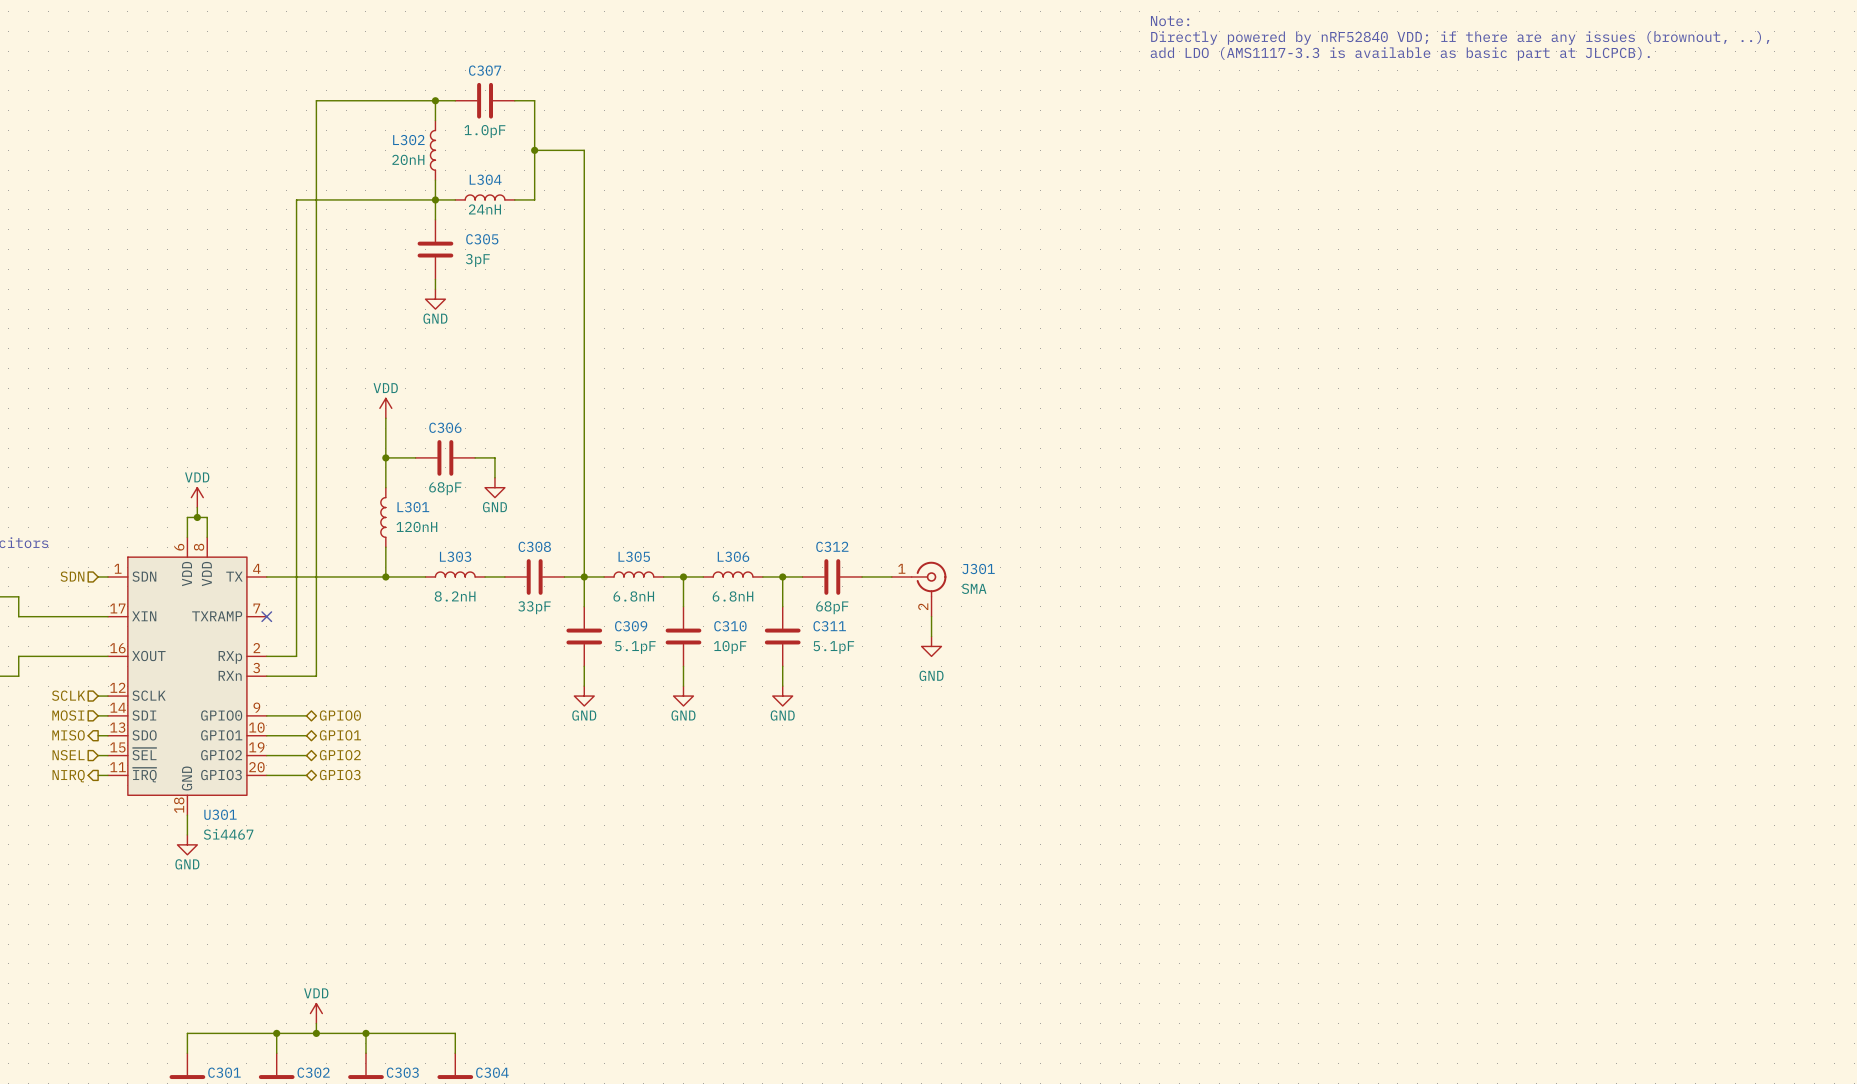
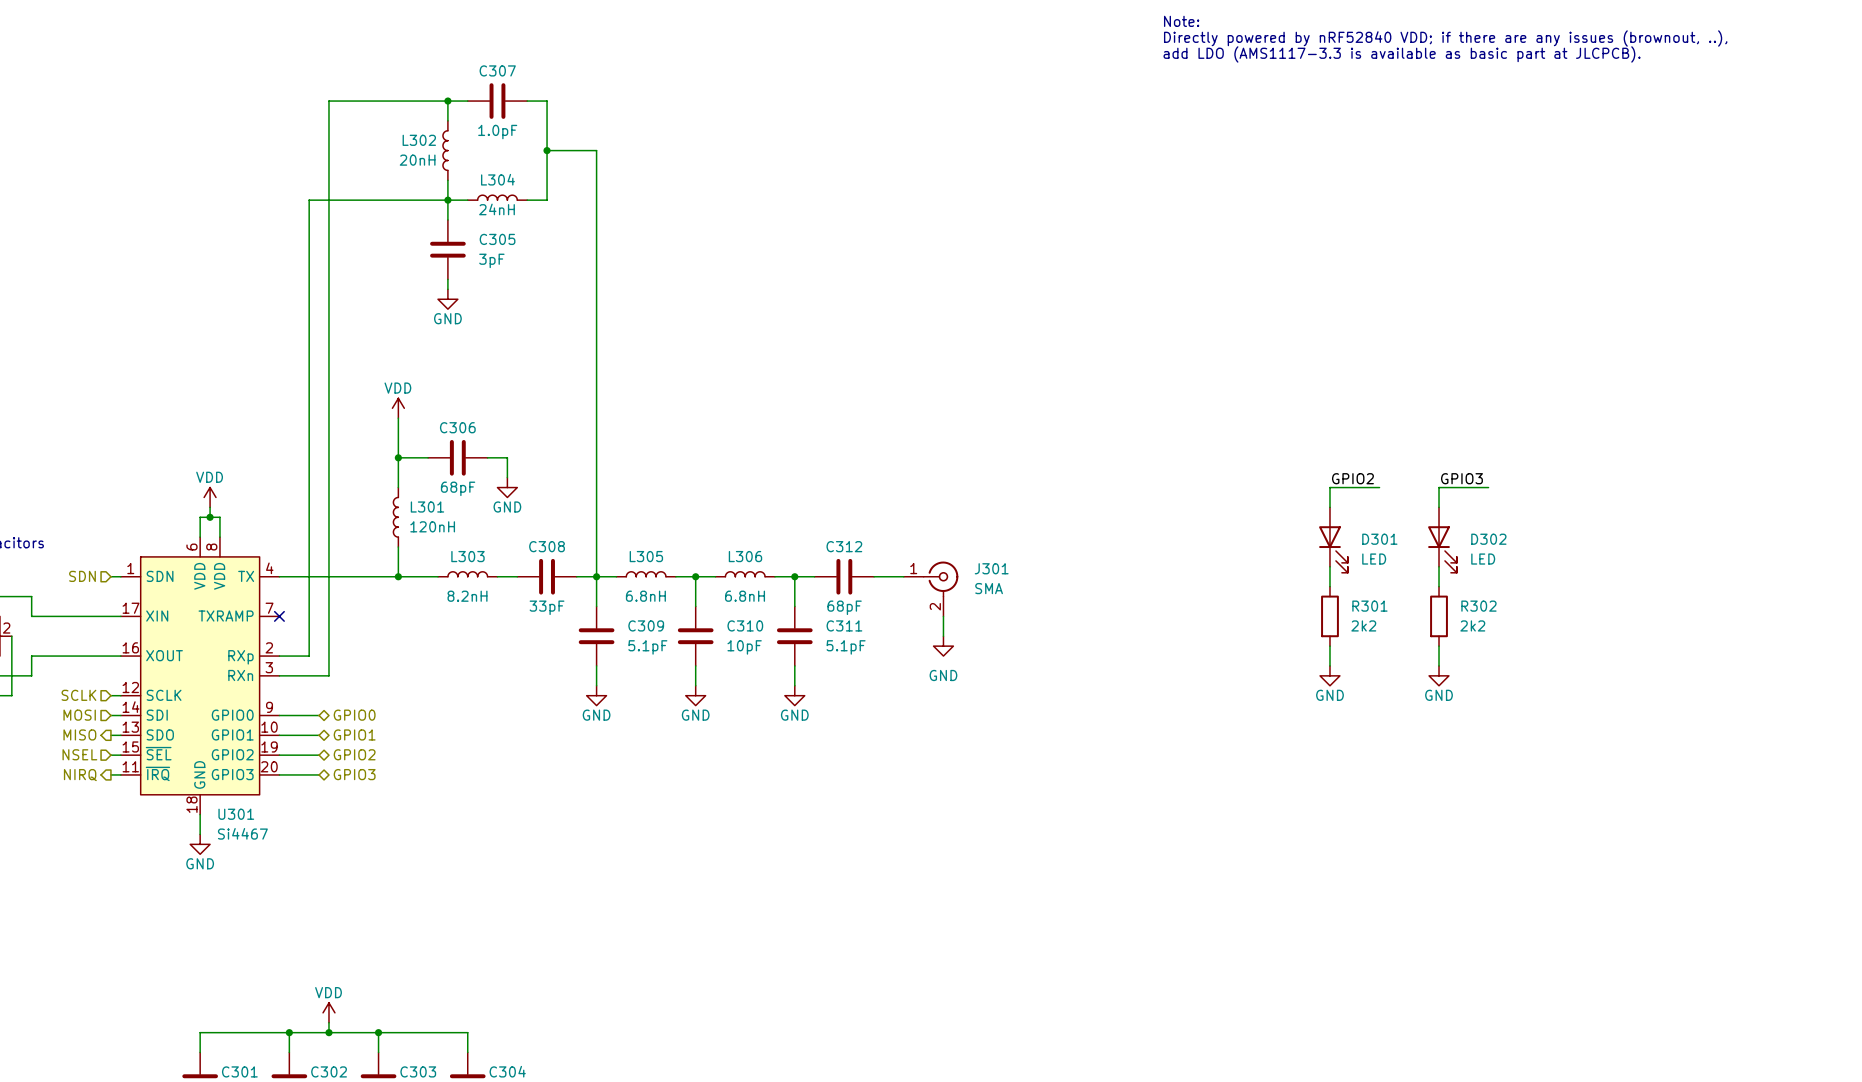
label: none -> GPIO2 (1352, 478)
label: none -> GPIO3 (1461, 478)
wire: none -> (1379, 487) (1329, 487) (1329, 507)
wire: none -> (1488, 487) (1439, 487) (1439, 507)
D301: none -> LED (1333, 540)
D302: none -> LED (1442, 540)
wire: none -> (1329, 566) (1329, 586)
wire: none -> (1439, 566) (1439, 586)
R301: none -> 2k2 (1329, 616)
R302: none -> 2k2 (1439, 616)
wire: none -> (1329, 646) (1329, 665)
wire: none -> (1439, 646) (1439, 665)
power symbol: none -> GND (1329, 675)
power symbol: none -> GND (1439, 675)

